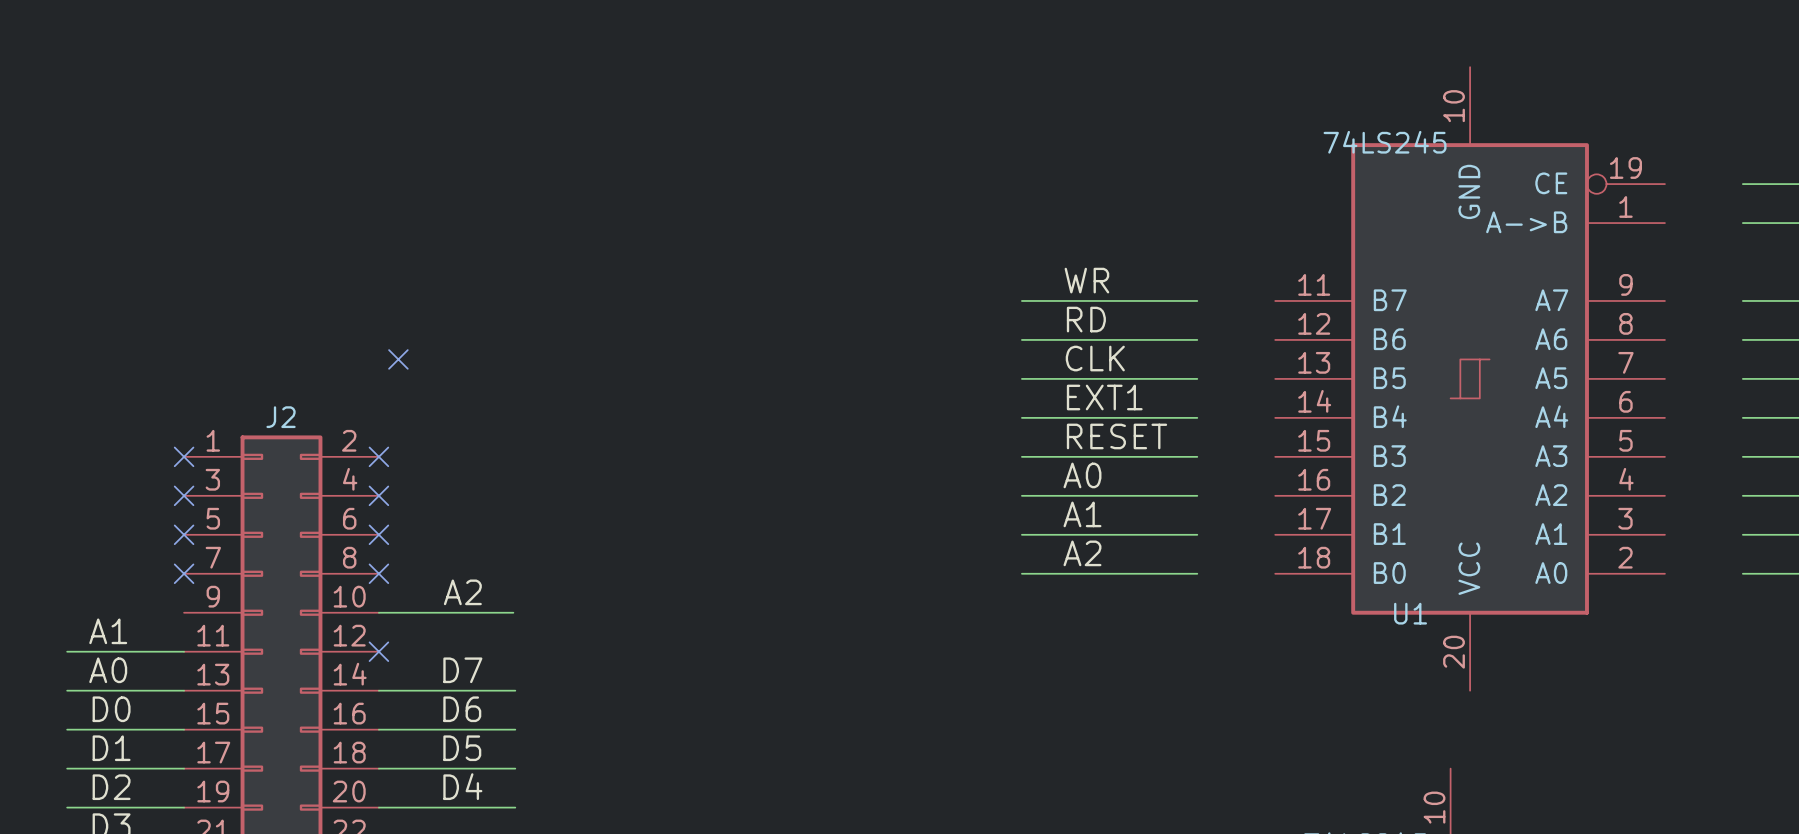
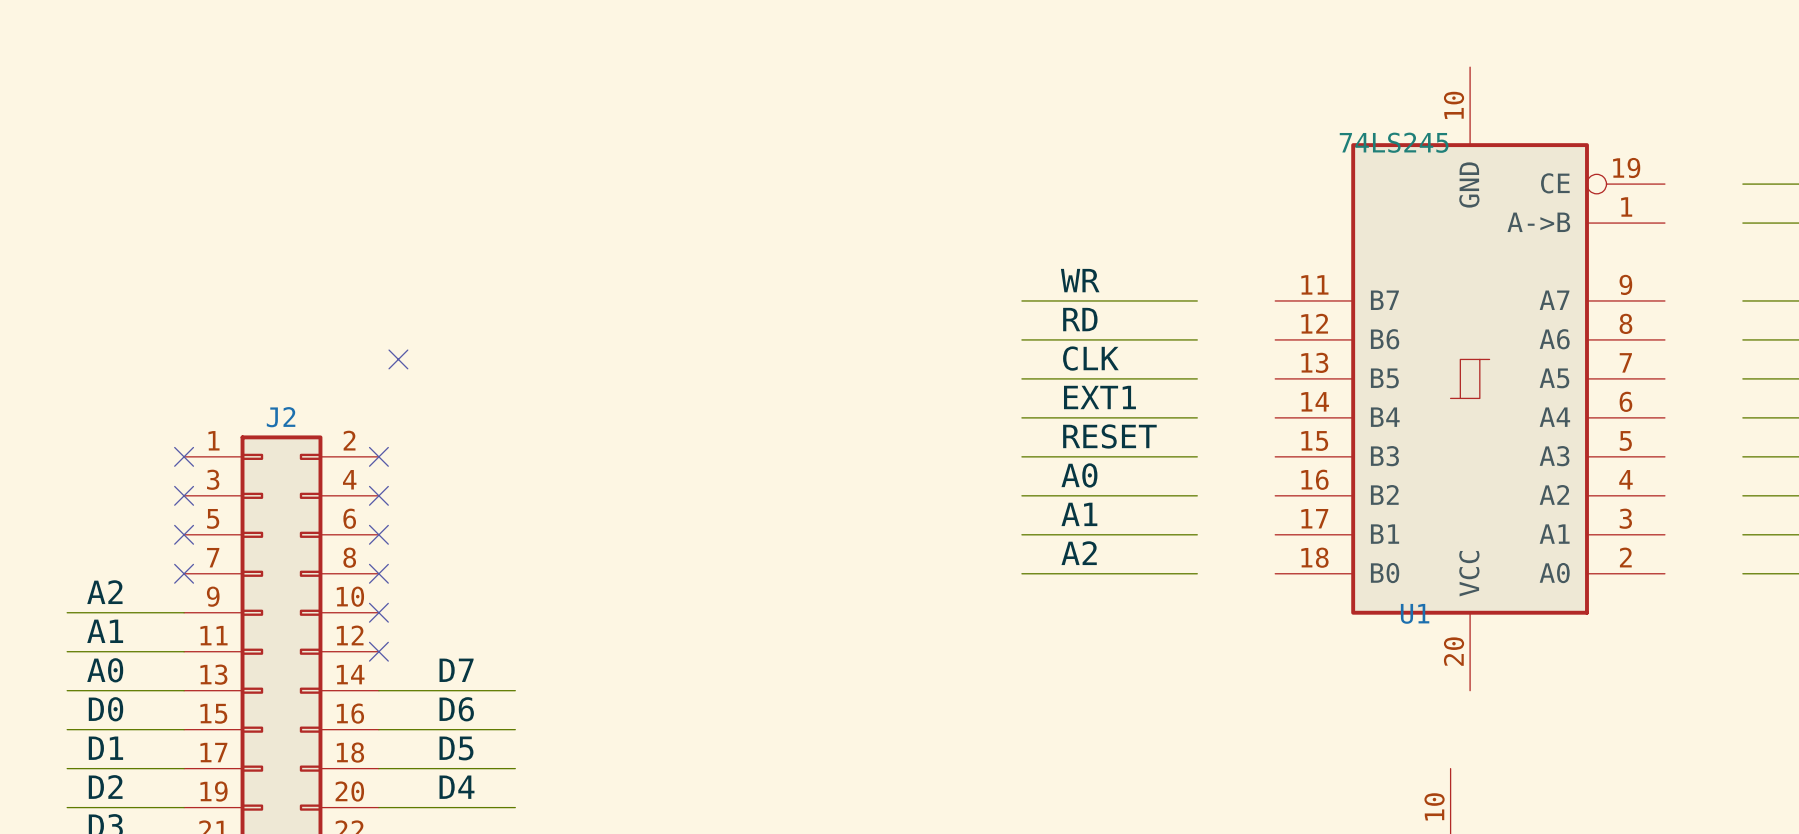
label position: A2 (462, 592) -> A2 (104, 592)
wire: none -> (67, 612) (184, 612)
wire: (378, 612) (513, 612) -> none
no-connect mark: none -> (378, 612)

